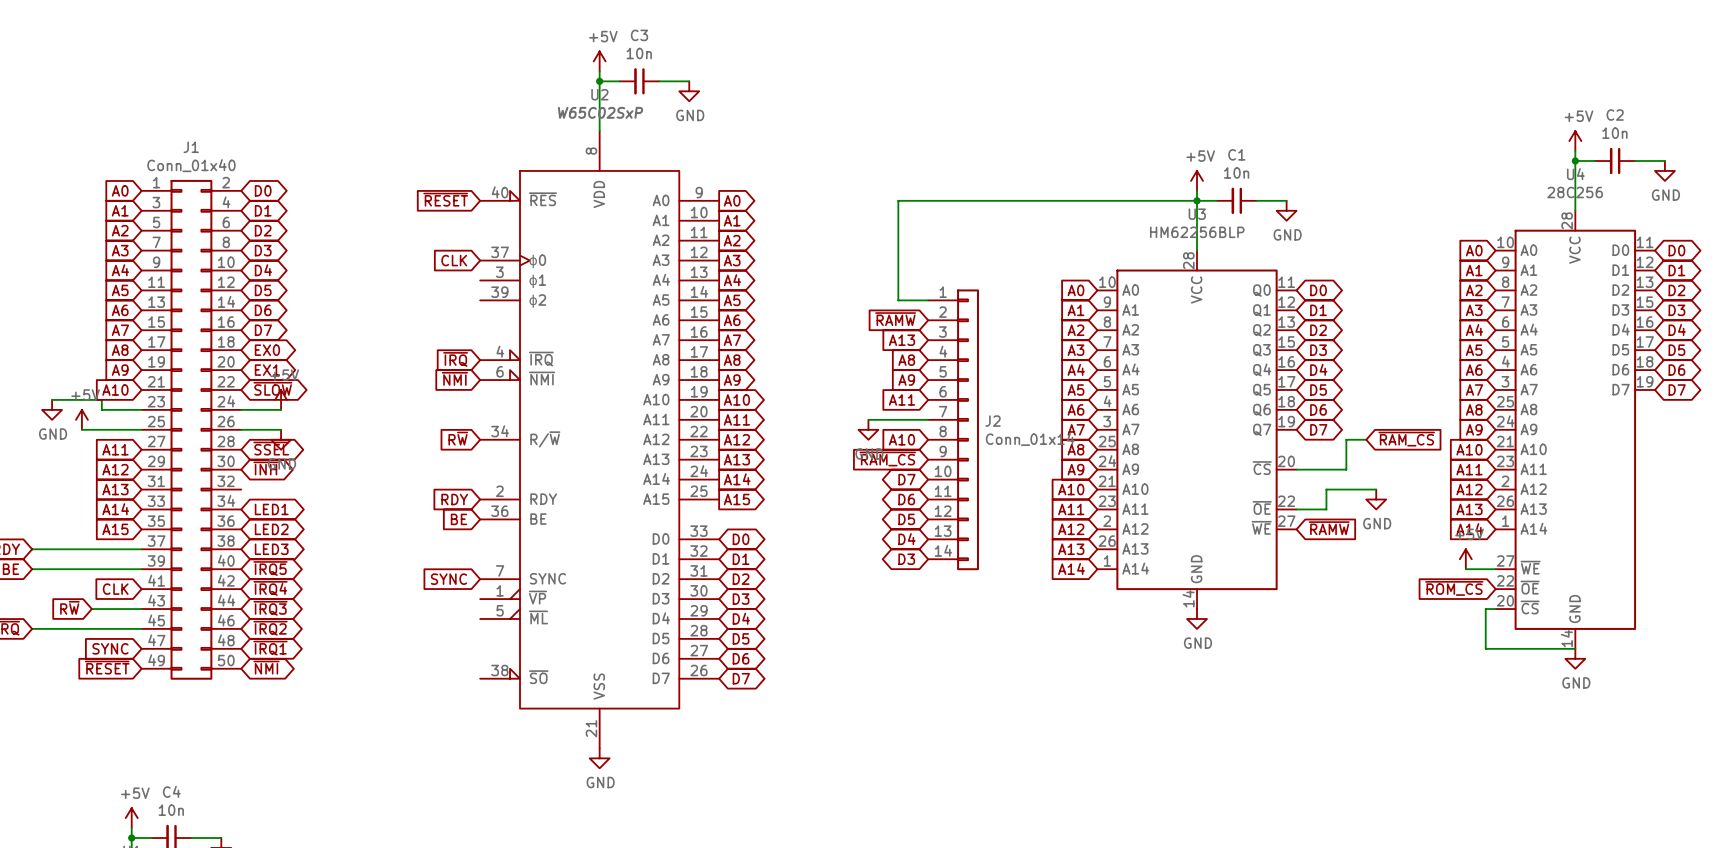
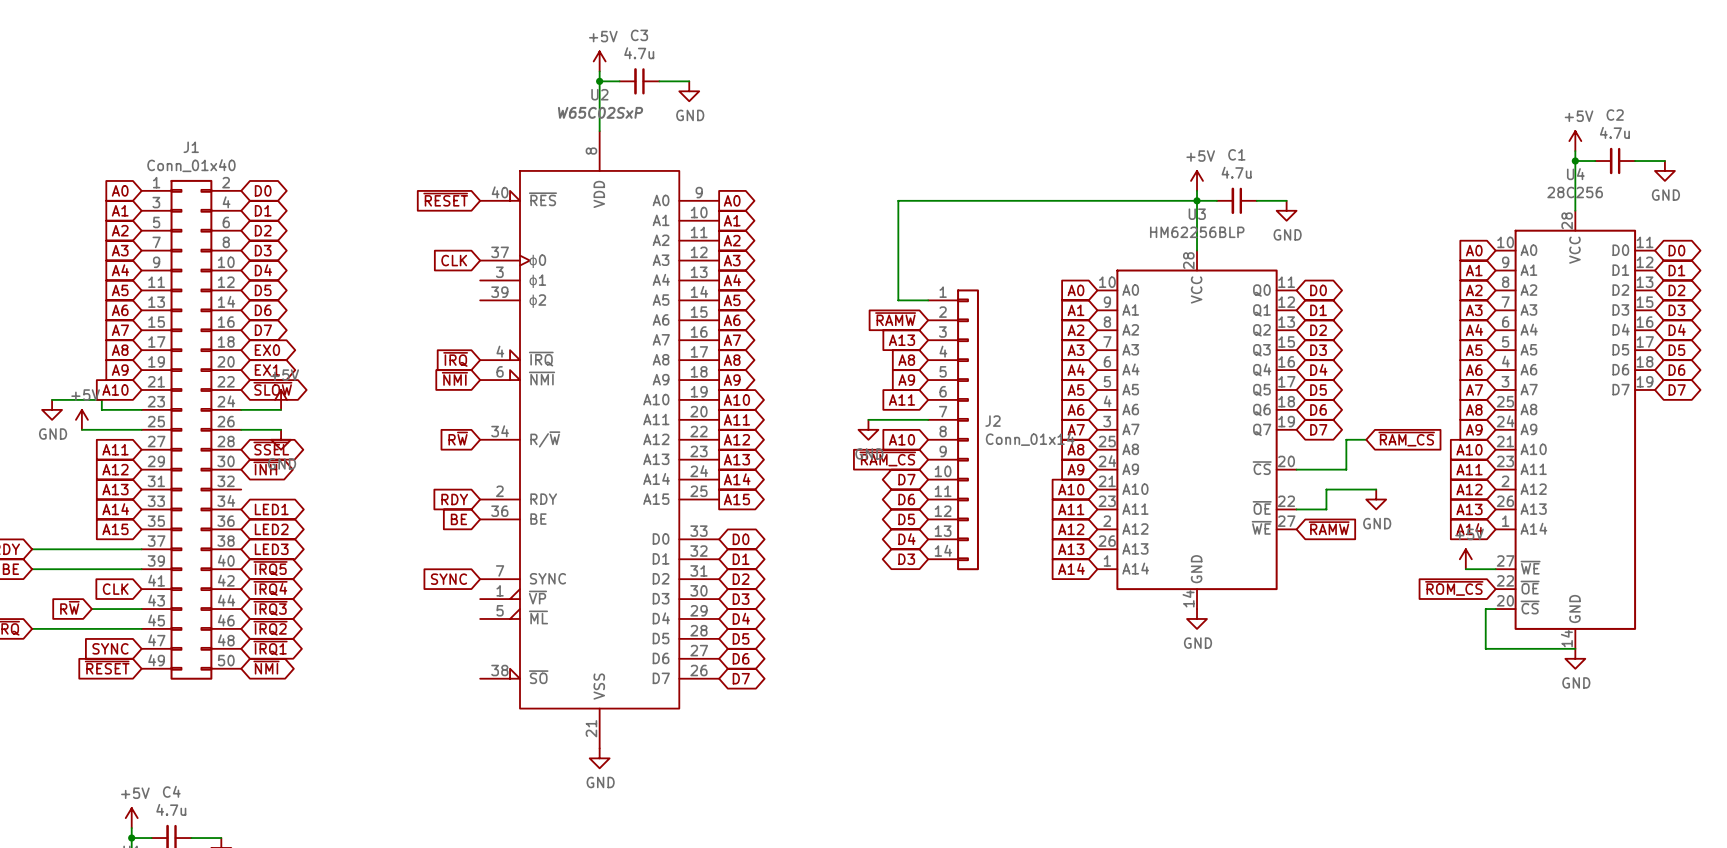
C3 value: 10n (639, 53) -> 4.7u (639, 53)
C2 value: 10n (1614, 133) -> 4.7u (1614, 132)
C1 value: 10n (1236, 172) -> 4.7u (1236, 172)
C4 value: 10n (171, 810) -> 4.7u (171, 809)

